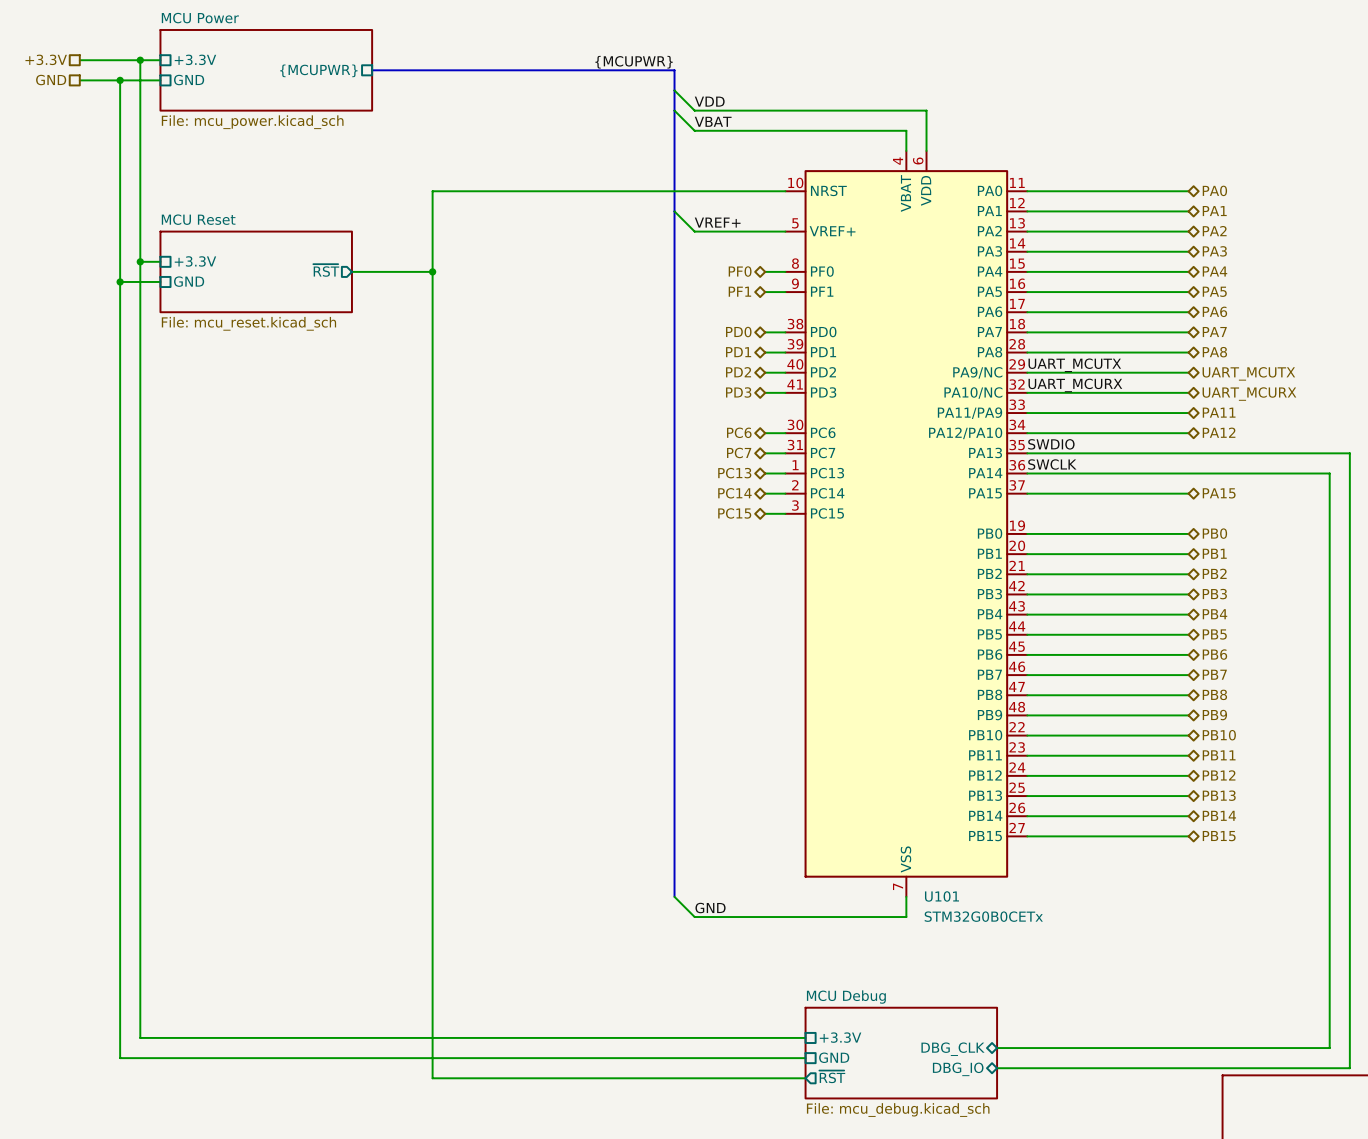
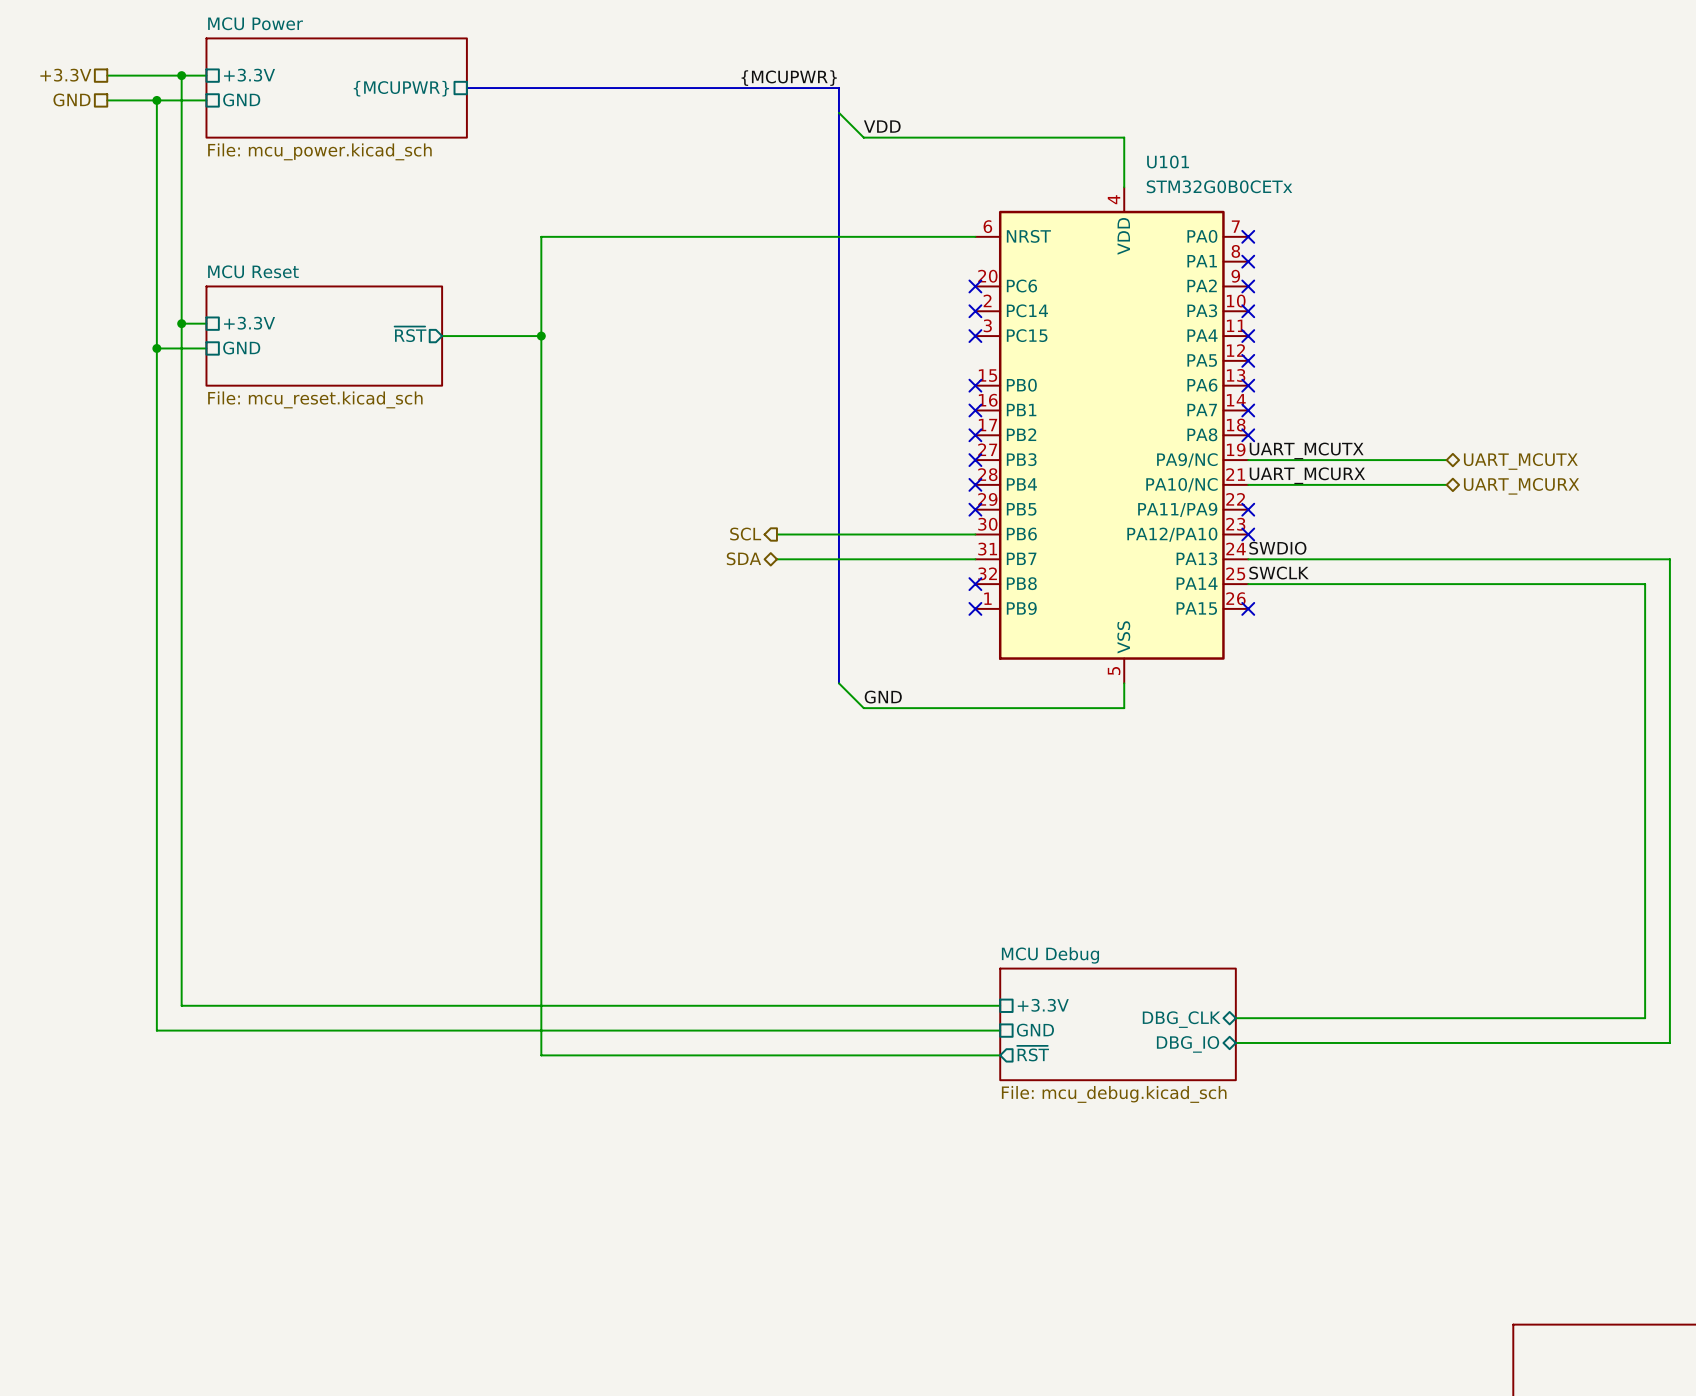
wire: (674, 110) (694, 130) (906, 130) -> none
wire: (906, 110) (926, 110) (926, 150) -> (1124, 137) (1124, 162)
label: VBAT (713, 121) -> none
U101 symbol: [785, 150, 1028, 897] -> [975, 187, 1249, 684]
hierarchical label: PA0 (1214, 190) -> none
no-connect mark: none -> (1248, 236)
wire: (1027, 191) (1188, 191) -> none
wire: (674, 211) (694, 231) (785, 231) -> none
no-connect mark: none -> (1248, 261)
wire: (1027, 211) (1188, 211) -> none
hierarchical label: PA1 (1214, 211) -> none
label: VREF+ (717, 222) -> none
no-connect mark: none -> (975, 286)
no-connect mark: none -> (1248, 286)
wire: (1027, 231) (1188, 231) -> none
hierarchical label: PA2 (1214, 231) -> none
no-connect mark: none -> (975, 311)
no-connect mark: none -> (1248, 311)
wire: (1027, 251) (1188, 251) -> none
hierarchical label: PA3 (1214, 251) -> none
hierarchical label: PF0 (740, 271) -> none
wire: (765, 271) (785, 271) -> none
no-connect mark: none -> (975, 336)
no-connect mark: none -> (1248, 336)
wire: (1027, 271) (1188, 271) -> none
hierarchical label: PA4 (1214, 271) -> none
hierarchical label: PF1 (739, 291) -> none
hierarchical label: PA5 (1214, 291) -> none
wire: (765, 292) (785, 292) -> none
no-connect mark: none -> (1248, 360)
wire: (1027, 292) (1188, 292) -> none
hierarchical label: PA6 (1214, 311) -> none
no-connect mark: none -> (975, 385)
no-connect mark: none -> (1248, 385)
wire: (1027, 312) (1188, 312) -> none
hierarchical label: PD0 (738, 332) -> none
wire: (765, 332) (785, 332) -> none
no-connect mark: none -> (975, 410)
no-connect mark: none -> (1248, 410)
wire: (1027, 332) (1188, 332) -> none
hierarchical label: PA7 (1214, 332) -> none
hierarchical label: PD1 (738, 352) -> none
wire: (765, 352) (785, 352) -> none
no-connect mark: none -> (975, 435)
no-connect mark: none -> (1248, 435)
wire: (1027, 352) (1188, 352) -> none
hierarchical label: PA8 (1214, 352) -> none
label position: UART_MCUTX (1074, 365) -> UART_MCUTX (1306, 450)
hierarchical label: PD2 (738, 372) -> none
wire: (765, 372) (785, 372) -> none
no-connect mark: none -> (975, 460)
hierarchical label position: UART_MCUTX (1248, 373) -> UART_MCUTX (1520, 461)
label position: UART_MCURX (1075, 385) -> UART_MCURX (1307, 475)
hierarchical label: PD3 (738, 392) -> none
wire: (765, 392) (785, 392) -> none
no-connect mark: none -> (975, 484)
hierarchical label position: UART_MCURX (1249, 394) -> UART_MCURX (1521, 486)
hierarchical label: PA11 (1219, 412) -> none
no-connect mark: none -> (975, 509)
no-connect mark: none -> (1248, 509)
wire: (1027, 413) (1188, 413) -> none
hierarchical label: none -> SCL (745, 534)
hierarchical label: PC6 (739, 432) -> none
hierarchical label: PA12 (1219, 432) -> none
wire: none -> (776, 534) (950, 534)
no-connect mark: none -> (1248, 534)
wire: (1027, 433) (1188, 433) -> none
label position: SWDIO (1051, 444) -> SWDIO (1277, 548)
hierarchical label: none -> SDA (743, 558)
hierarchical label: PC7 (739, 452) -> none
wire: none -> (776, 559) (950, 559)
label position: SWCLK (1052, 464) -> SWCLK (1279, 573)
hierarchical label: PC13 (734, 473) -> none
wire: (765, 473) (785, 473) -> none
no-connect mark: none -> (975, 584)
hierarchical label: PC14 (734, 493) -> none
wire: (765, 493) (785, 493) -> none
no-connect mark: none -> (975, 608)
no-connect mark: none -> (1248, 608)
wire: (1027, 493) (1188, 493) -> none
hierarchical label: PA15 (1219, 493) -> none
hierarchical label: PC15 (734, 513) -> none
wire: (765, 513) (785, 513) -> none
wire: (1027, 533) (1188, 533) -> none
hierarchical label: PB0 (1214, 533) -> none
hierarchical label: PB1 (1214, 553) -> none
wire: none -> (838, 683) (863, 708) (1124, 708) (1124, 683)
bus: (674, 554) (674, 896) -> none
wire: (1027, 554) (1188, 554) -> none
label: none -> GND (883, 697)
hierarchical label: PB2 (1214, 573) -> none
wire: (1027, 574) (1188, 574) -> none
wire: (1027, 594) (1188, 594) -> none
hierarchical label: PB3 (1214, 594) -> none
wire: (1027, 614) (1188, 614) -> none
hierarchical label: PB4 (1214, 614) -> none
wire: (1027, 634) (1188, 634) -> none
hierarchical label: PB5 (1214, 634) -> none
wire: (1027, 654) (1188, 654) -> none
hierarchical label: PB6 (1214, 654) -> none
hierarchical label: PB7 (1214, 674) -> none
wire: (1027, 675) (1188, 675) -> none
hierarchical label: PB8 (1214, 694) -> none
wire: (1027, 695) (1188, 695) -> none
wire: (1027, 715) (1188, 715) -> none
hierarchical label: PB9 (1214, 715) -> none
wire: (1027, 735) (1188, 735) -> none
hierarchical label: PB10 (1219, 735) -> none
wire: (1027, 755) (1188, 755) -> none
hierarchical label: PB11 (1219, 755) -> none
wire: (1027, 775) (1188, 775) -> none
hierarchical label: PB12 (1219, 775) -> none
hierarchical label: PB13 (1219, 795) -> none
wire: (1027, 796) (1188, 796) -> none
sheet pin: none -> +3.3V (1043, 1005)
hierarchical label: PB14 (1219, 815) -> none
wire: (140, 816) (140, 1037) (805, 1037) -> (181, 1005) (1000, 1005)
wire: (1027, 816) (1188, 816) -> none
wire: (1329, 826) (1329, 1048) (997, 1048) -> (1645, 1018) (1235, 1018)
sheet pin: none -> DBG_CLK (1181, 1019)
sheet MCU Debug: none -> File: mcu_debug.kicad_sch (1118, 1024)
wire: (120, 836) (120, 1058) (805, 1058) -> (156, 1030) (1000, 1030)
sheet pin: none -> GND (1035, 1030)
wire: (1027, 836) (1188, 836) -> none
hierarchical label: PB15 (1219, 836) -> none
wire: (1349, 846) (1349, 1068) (997, 1068) -> (1669, 1042) (1235, 1042)
sheet pin: none -> DBG_IO (1188, 1044)
sheet pin: none -> ~{RST} (1033, 1053)
wire: (432, 856) (432, 1078) (805, 1078) -> (541, 1055) (1000, 1055)
wire: (674, 896) (694, 917) (906, 917) (906, 896) -> none
U101 name position: U101 (941, 896) -> U101 (1168, 161)
label: GND (710, 908) -> none
U101 value position: STM32G0B0CETx (983, 916) -> STM32G0B0CETx (1219, 186)
sheet pin: +3.3V (840, 1037) -> none
sheet pin: DBG_CLK (953, 1049) -> none
sheet MCU Debug: File: mcu_debug.kicad_sch (901, 1053) -> none
sheet pin: GND (834, 1057) -> none
sheet pin: DBG_IO (958, 1069) -> none
sheet pin: ~{RST} (832, 1076) -> none

